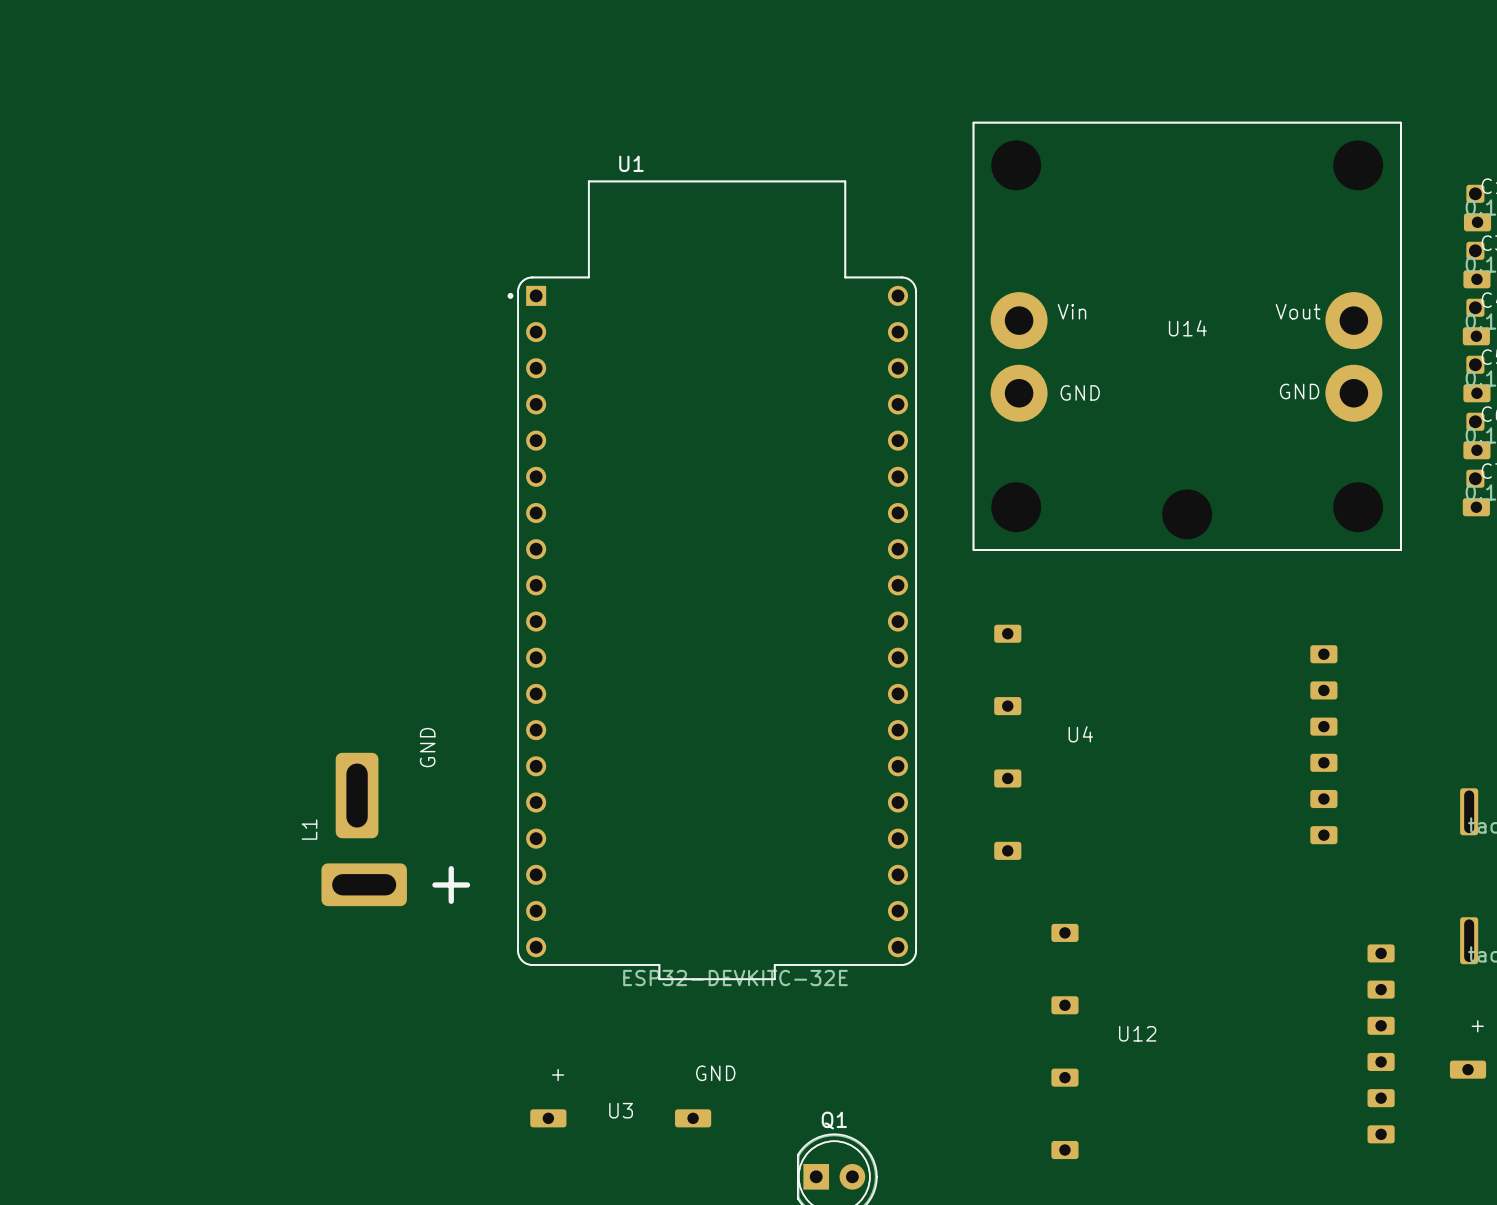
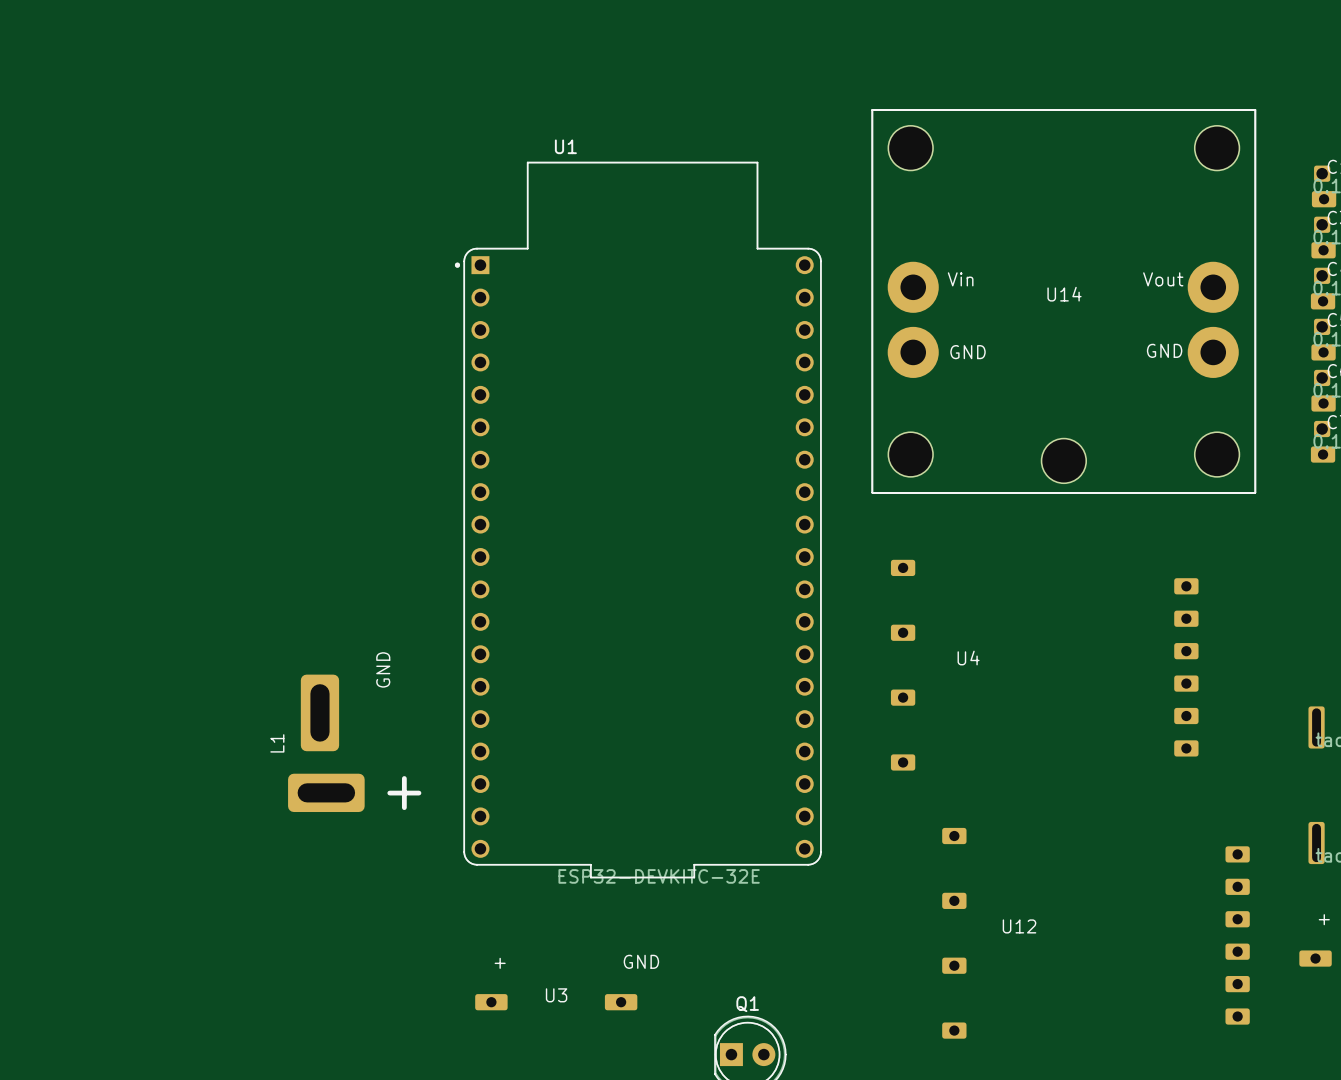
U14 footprint: [972, 121, 1402, 551] -> [871, 109, 1257, 494]

